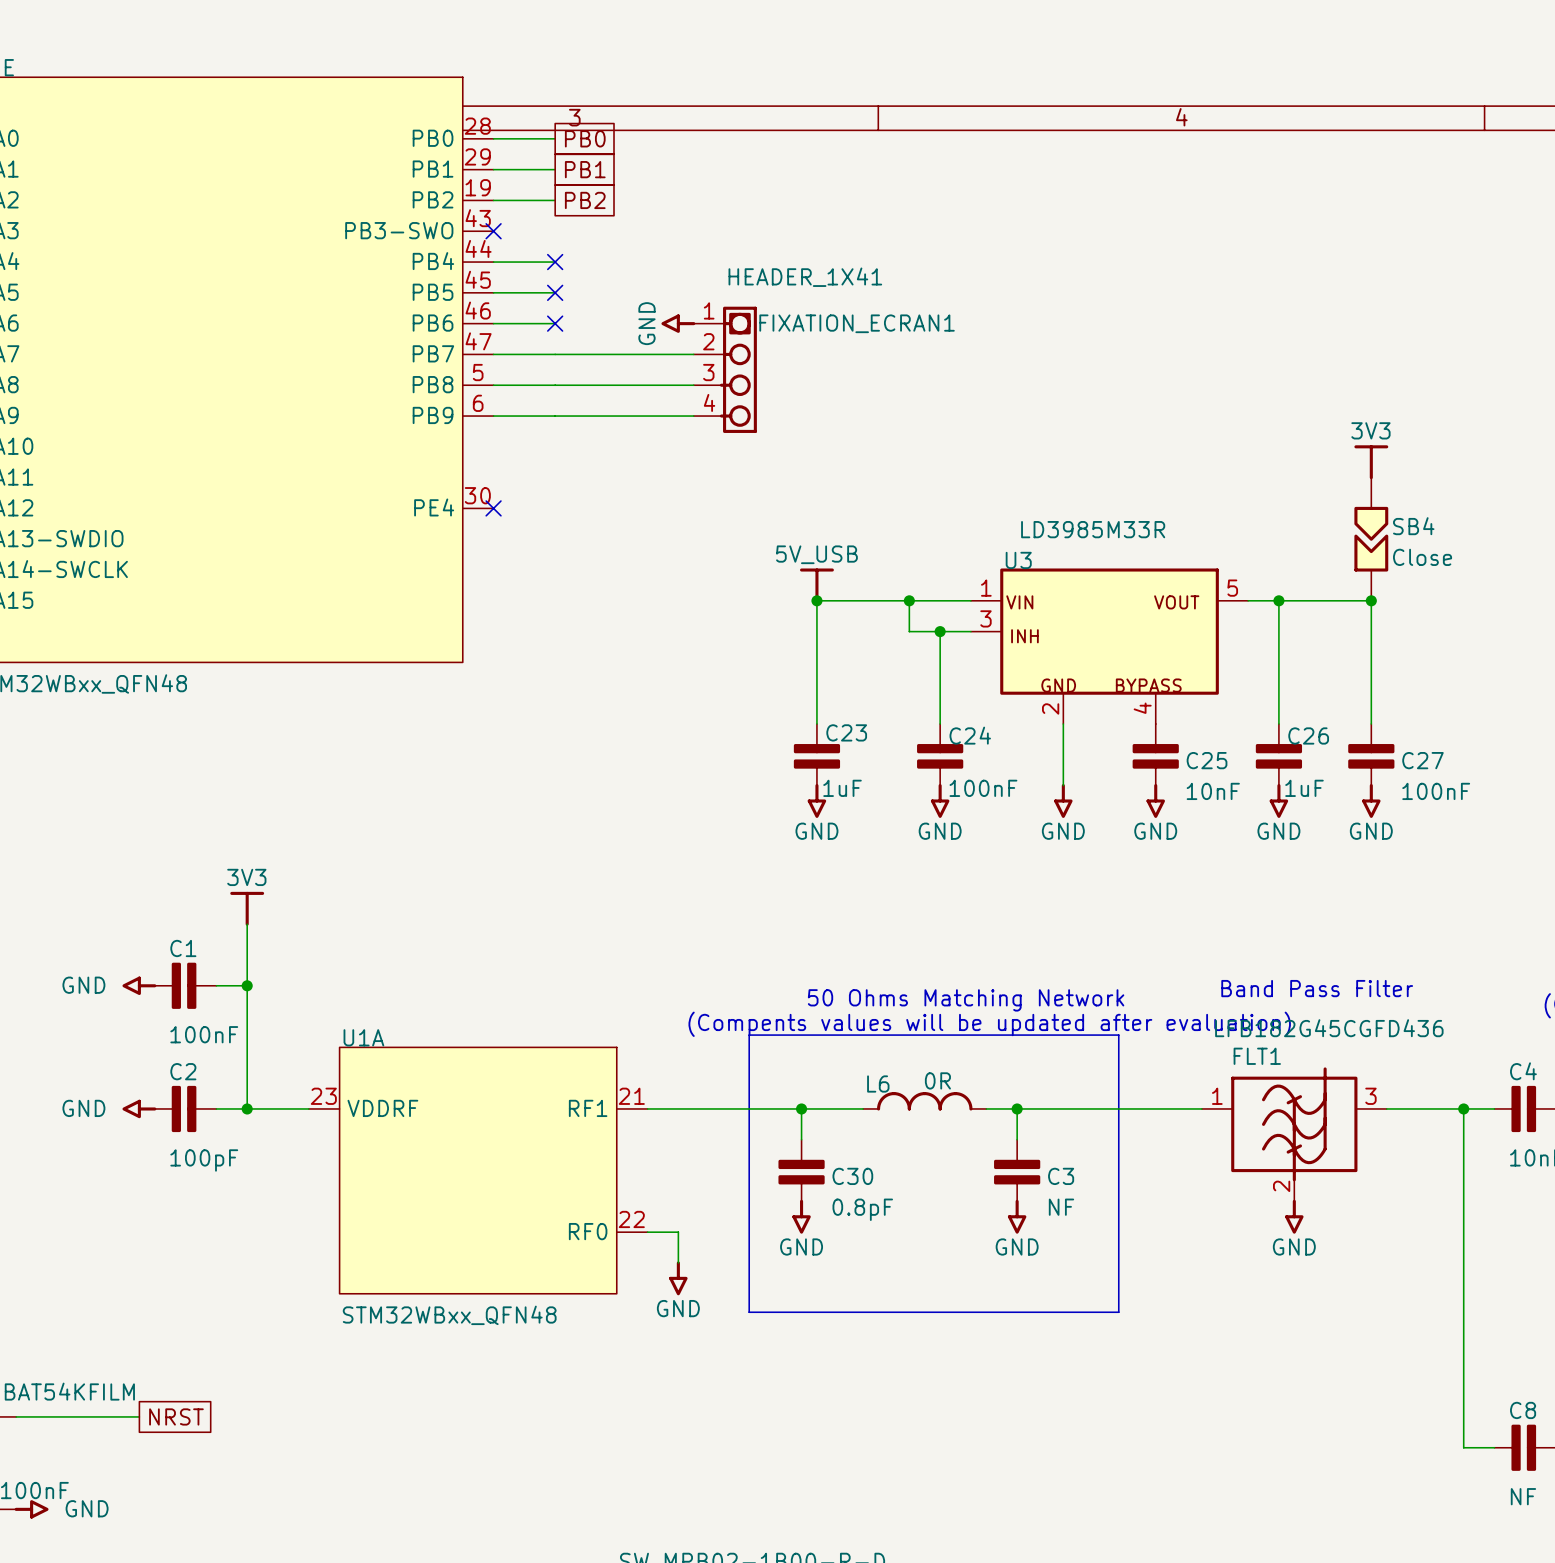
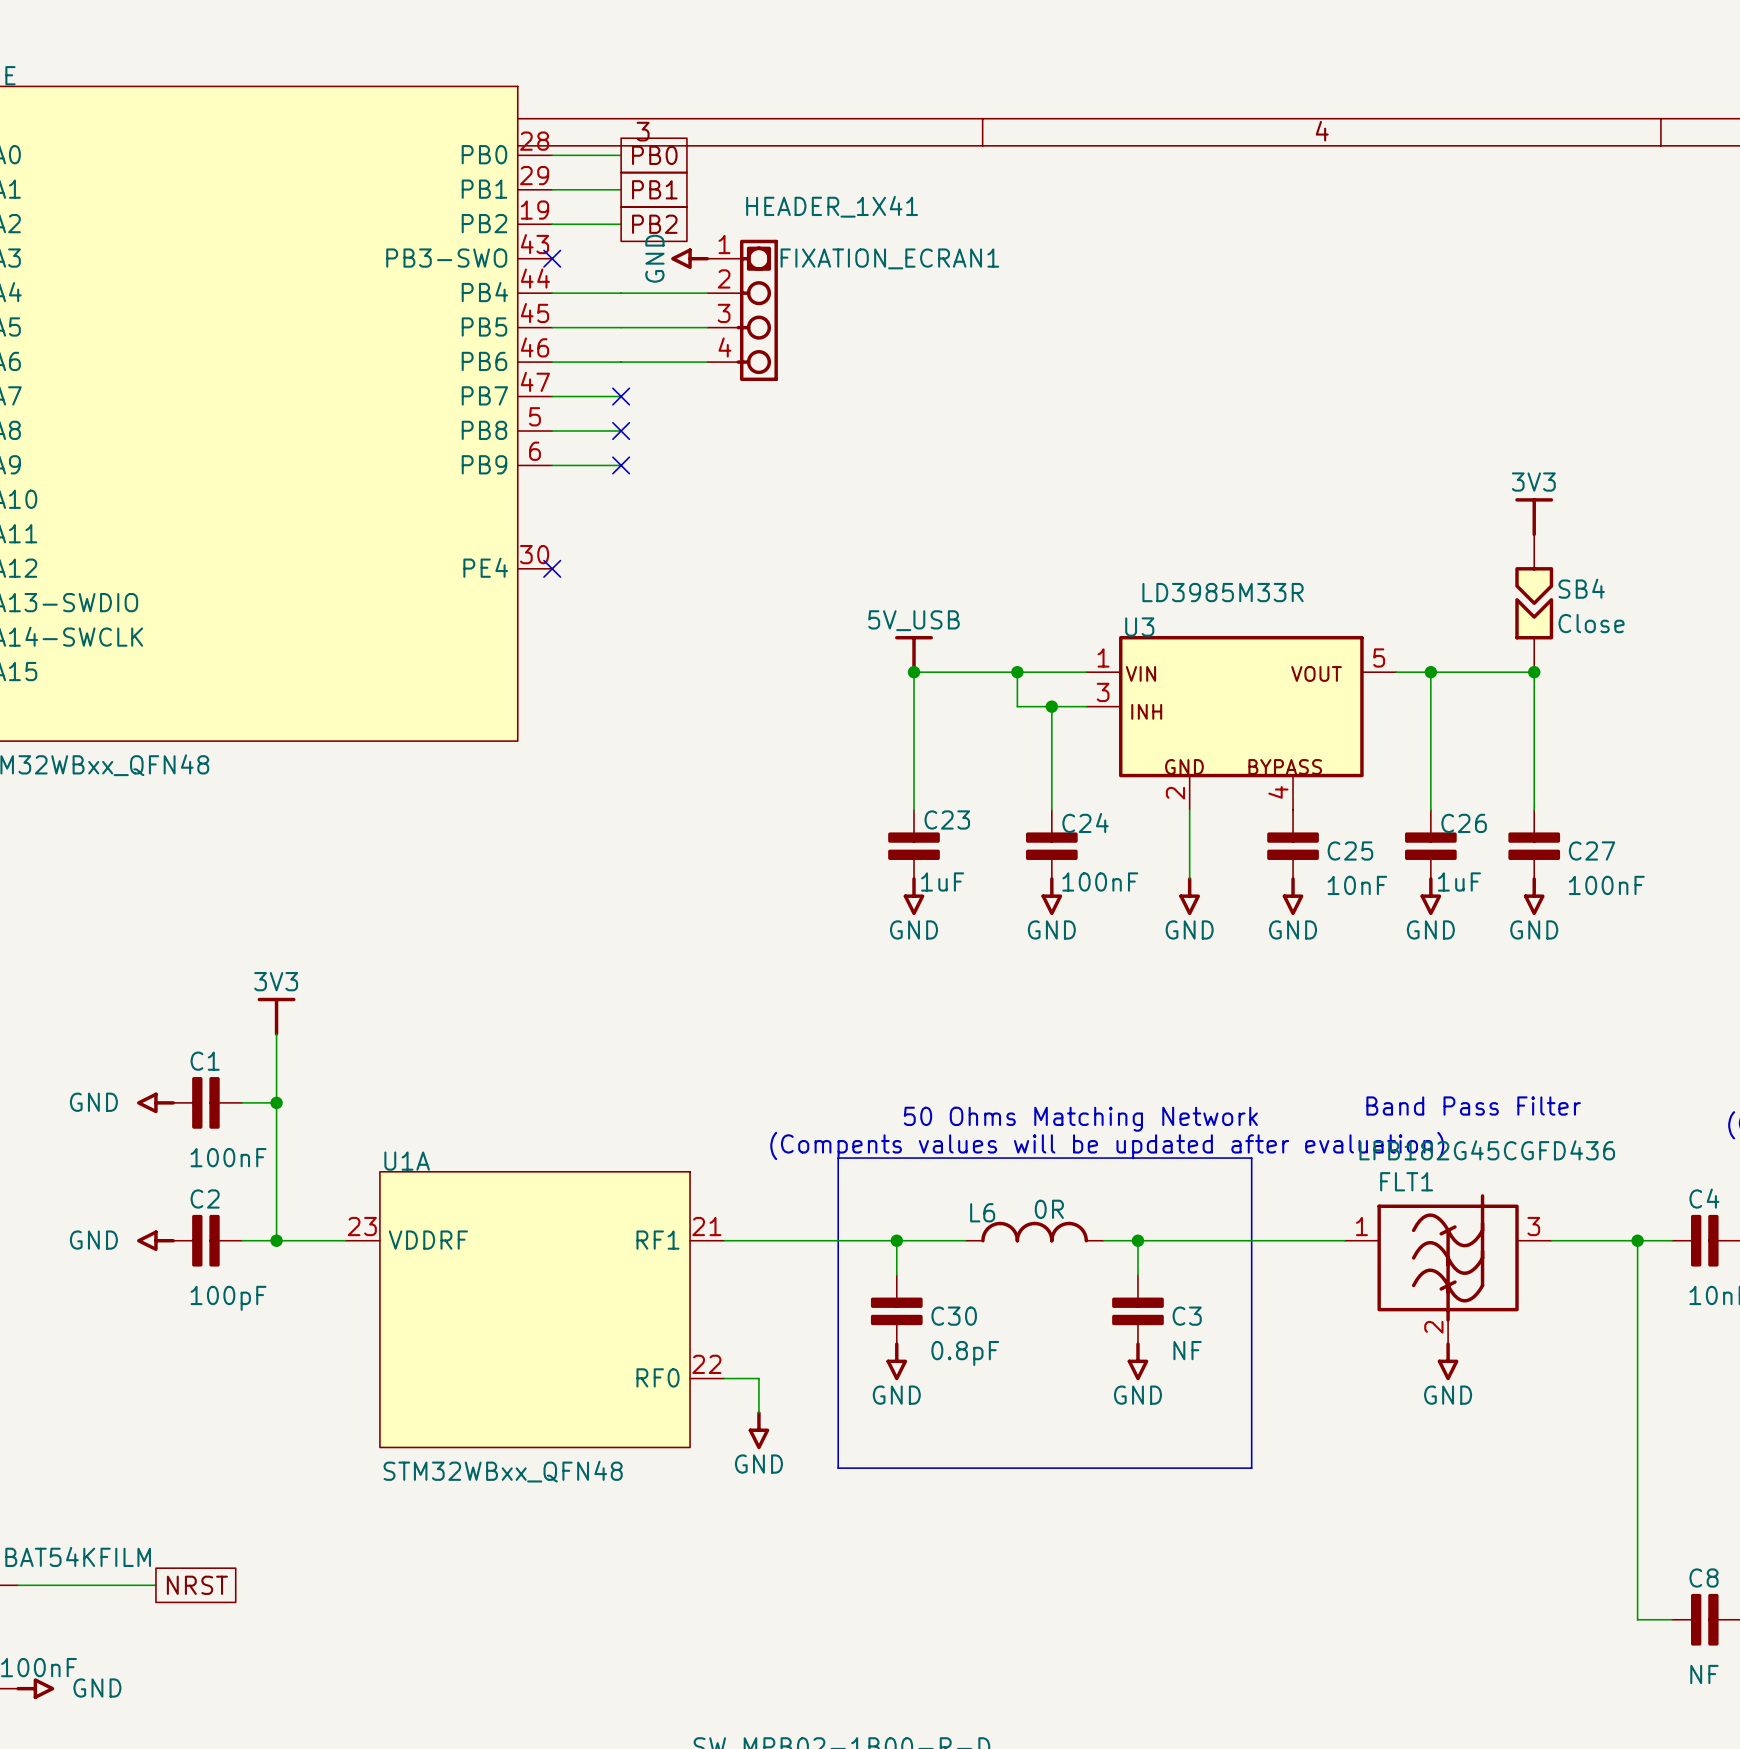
wire: none -> (621, 293) (707, 293)
no-connect mark: (555, 262) -> none
wire: none -> (621, 327) (707, 327)
no-connect mark: (555, 292) -> none
wire: none -> (621, 362) (707, 362)
no-connect mark: (555, 323) -> none
power symbol position: GND (678, 323) -> GND (690, 258)
wire: (555, 354) (693, 354) -> none
no-connect mark: none -> (621, 396)
FIXATION_ECRAN1 position: (725, 369) -> (742, 310)
wire: (555, 385) (693, 385) -> none
no-connect mark: none -> (621, 430)
wire: (555, 416) (693, 416) -> none
no-connect mark: none -> (621, 465)

